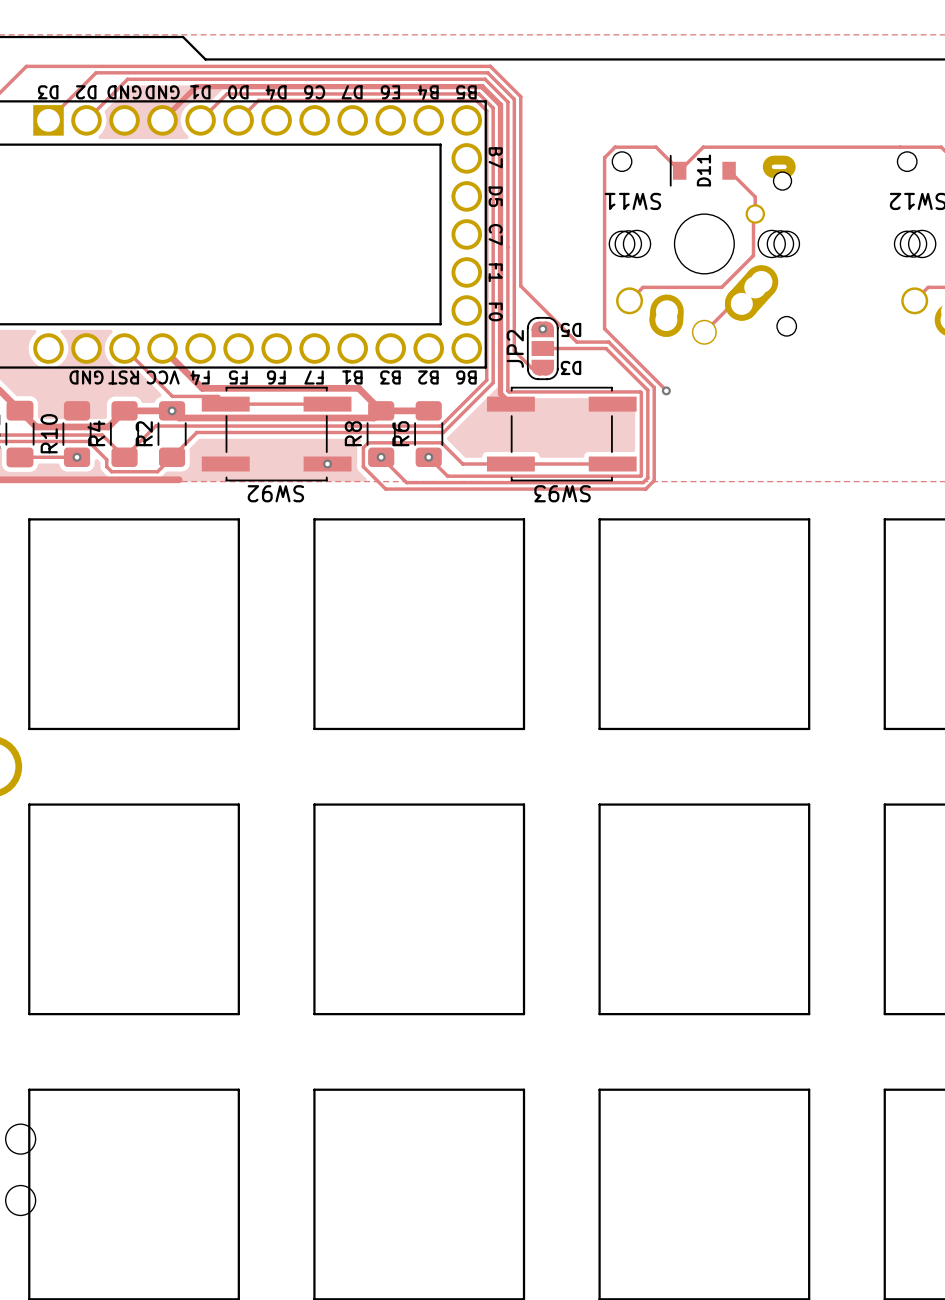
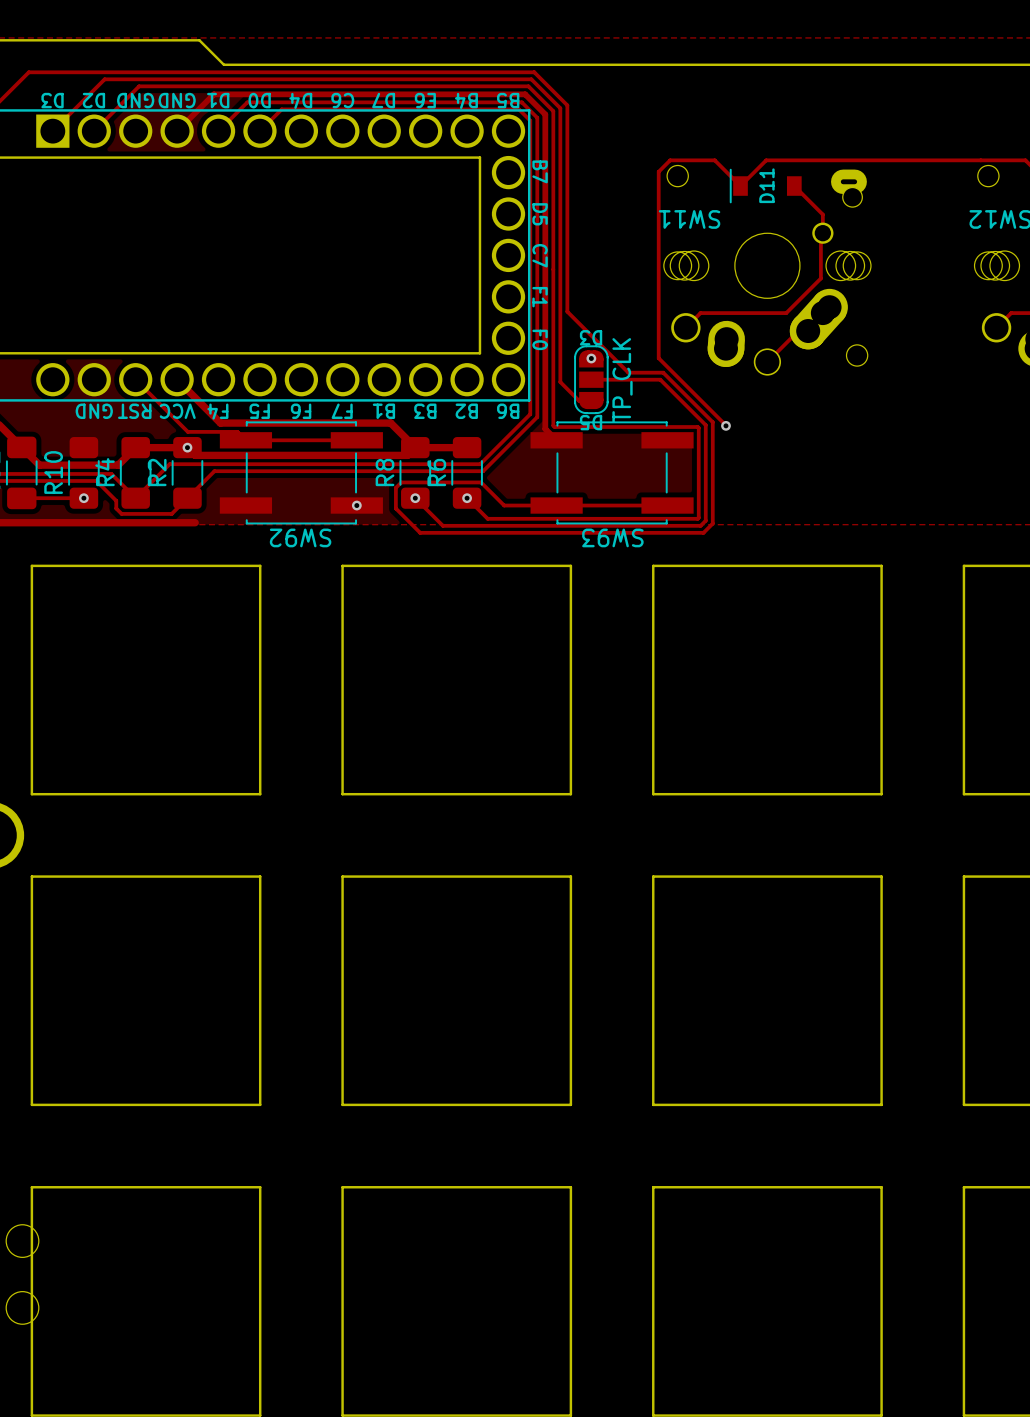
JP2 text position: D5 (571, 329) -> D5 (591, 422)
JP2 name: JP2 (515, 348) -> none
JP2 value: none -> TP_CLK (622, 380)
JP2 text position: D3 (571, 367) -> D3 (591, 337)

